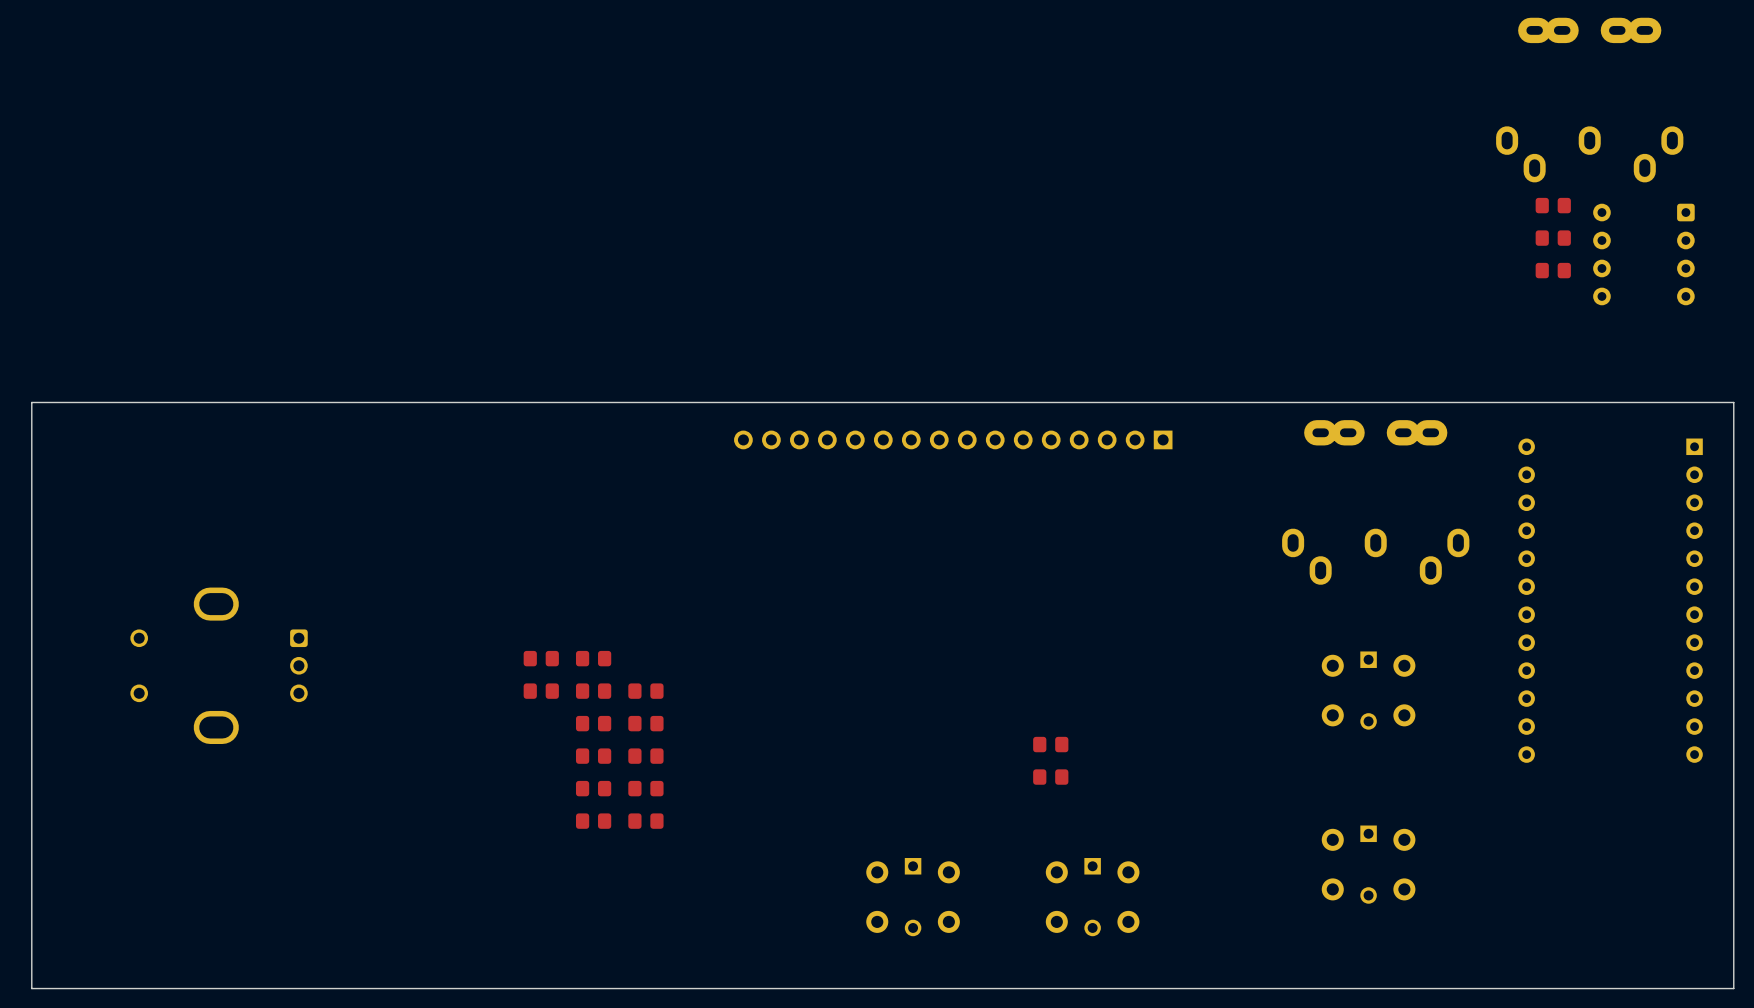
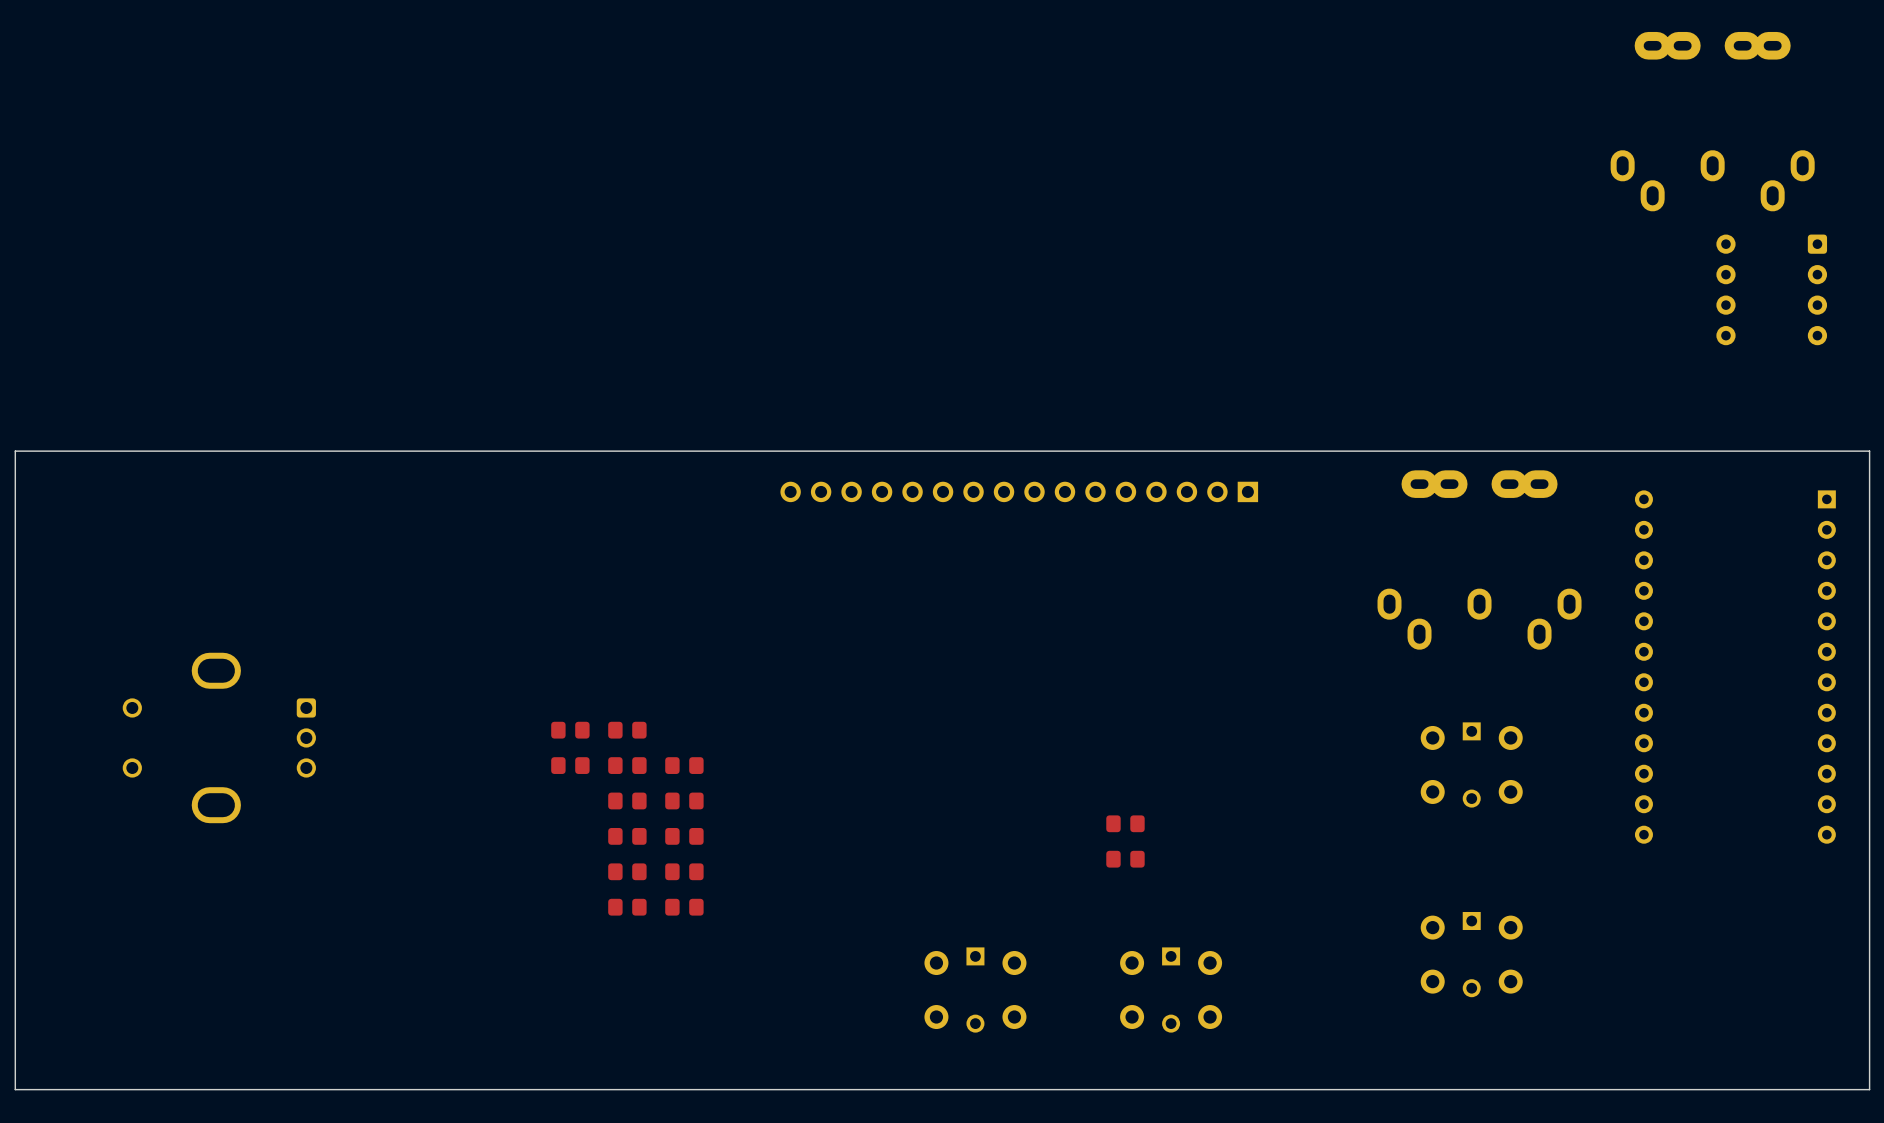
part: (1553, 205) -> none
part: (1553, 238) -> none
part: (1553, 270) -> none

